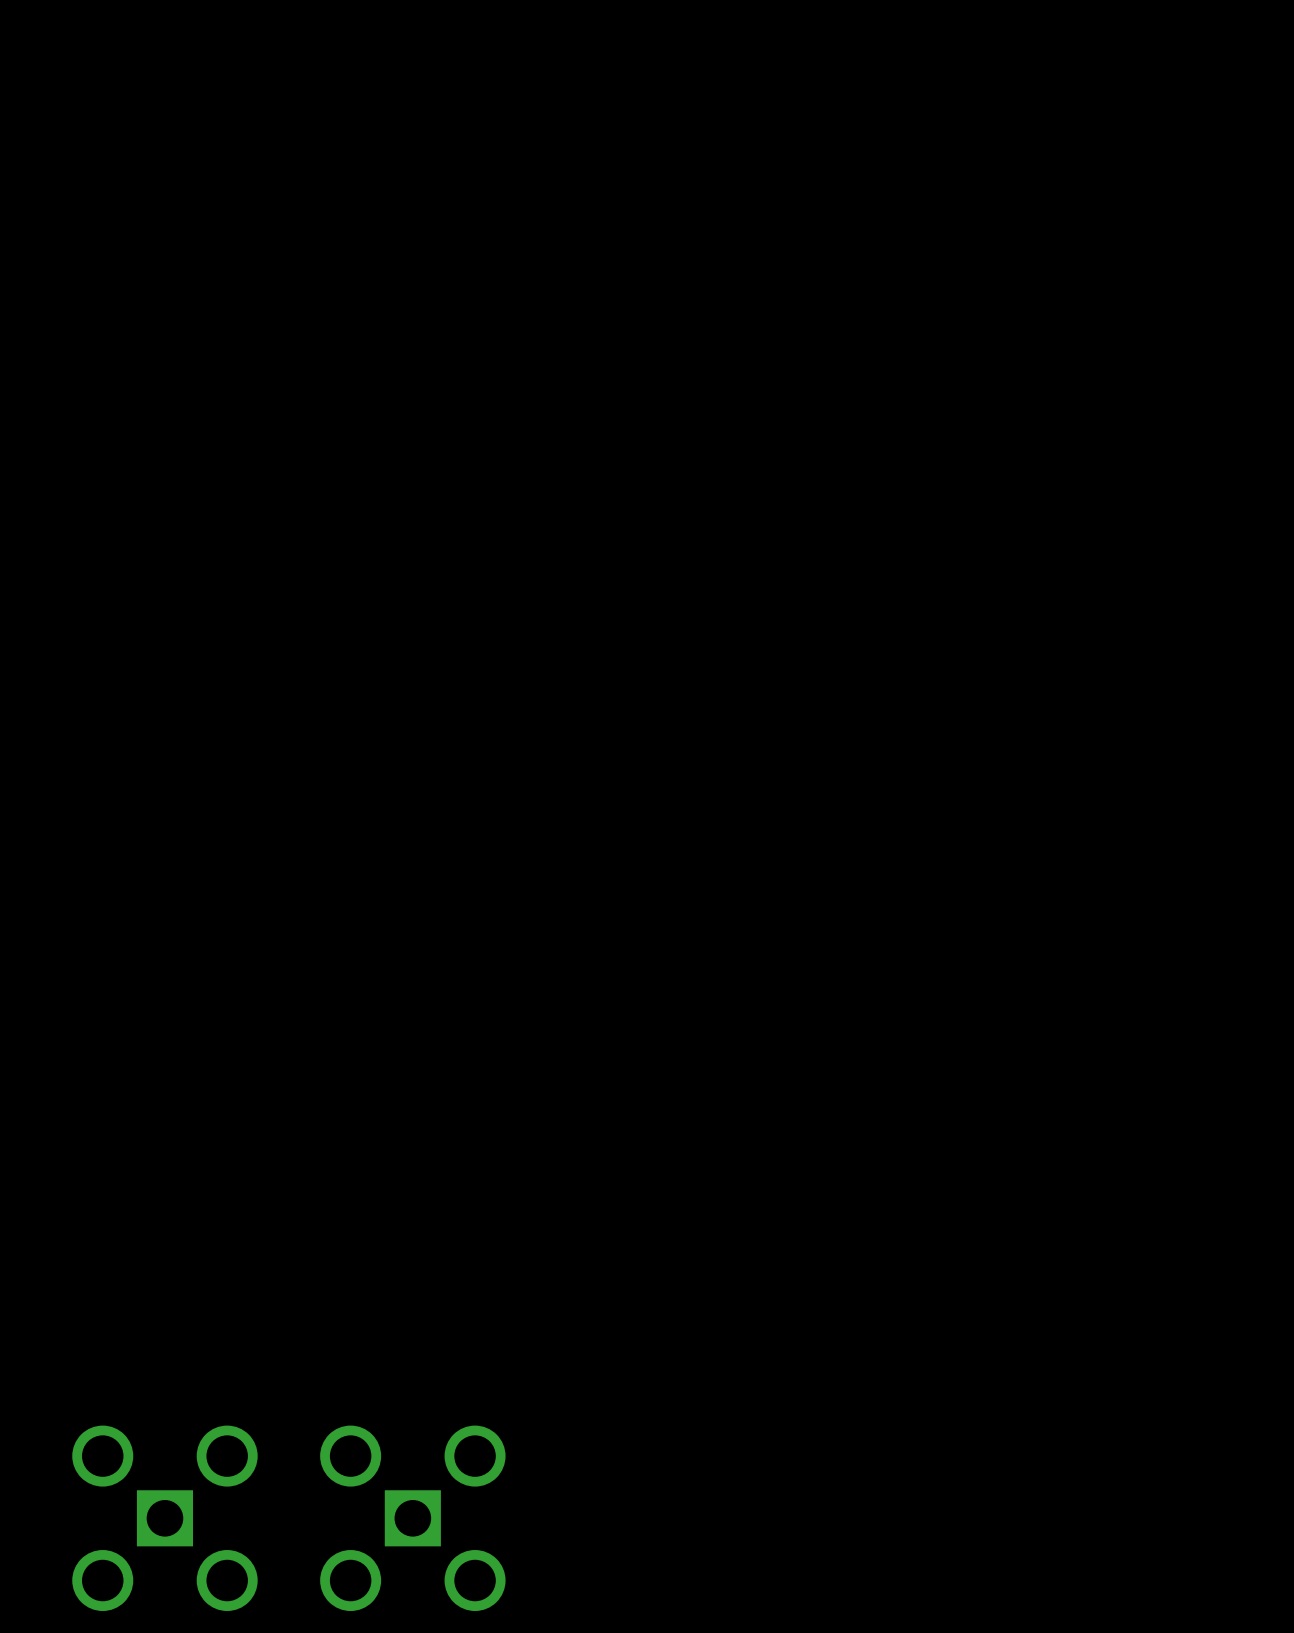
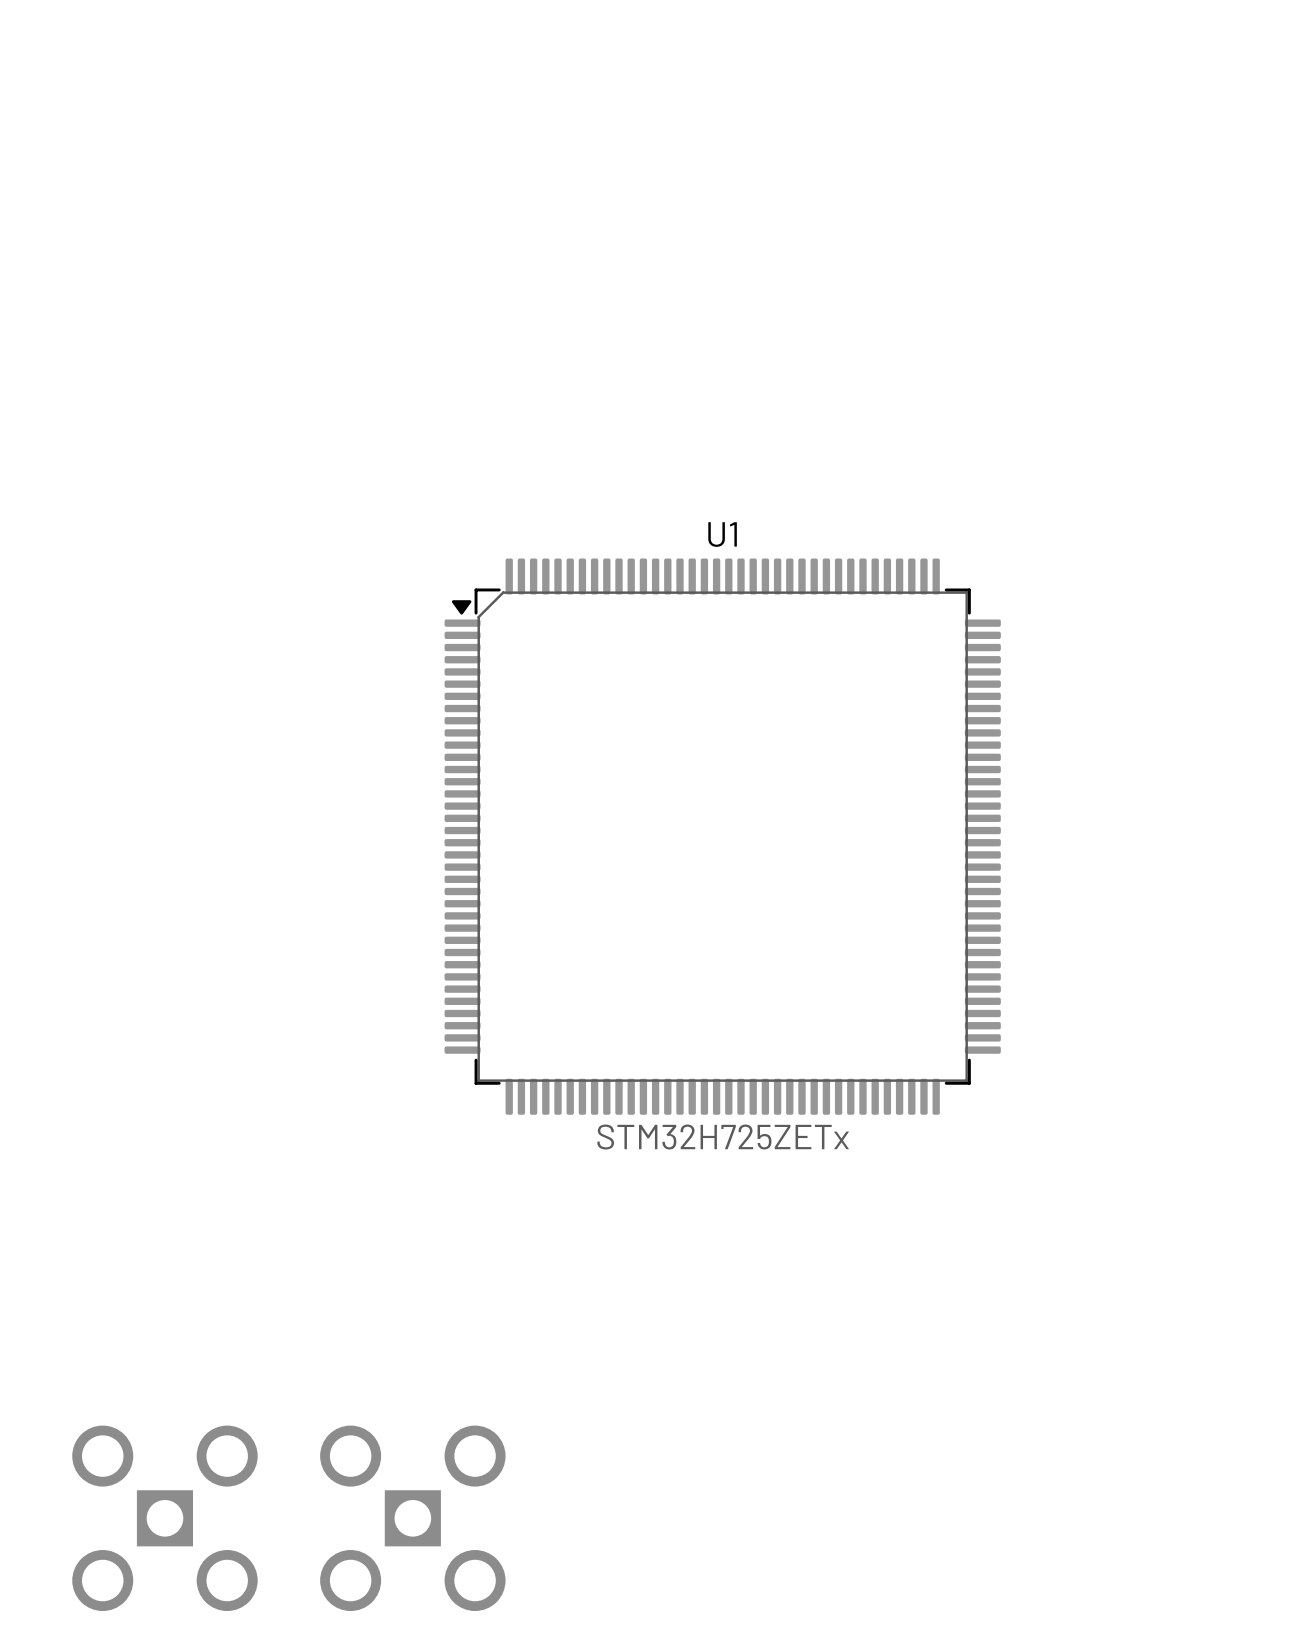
U1: none -> STM32H725ZETx (722, 836)

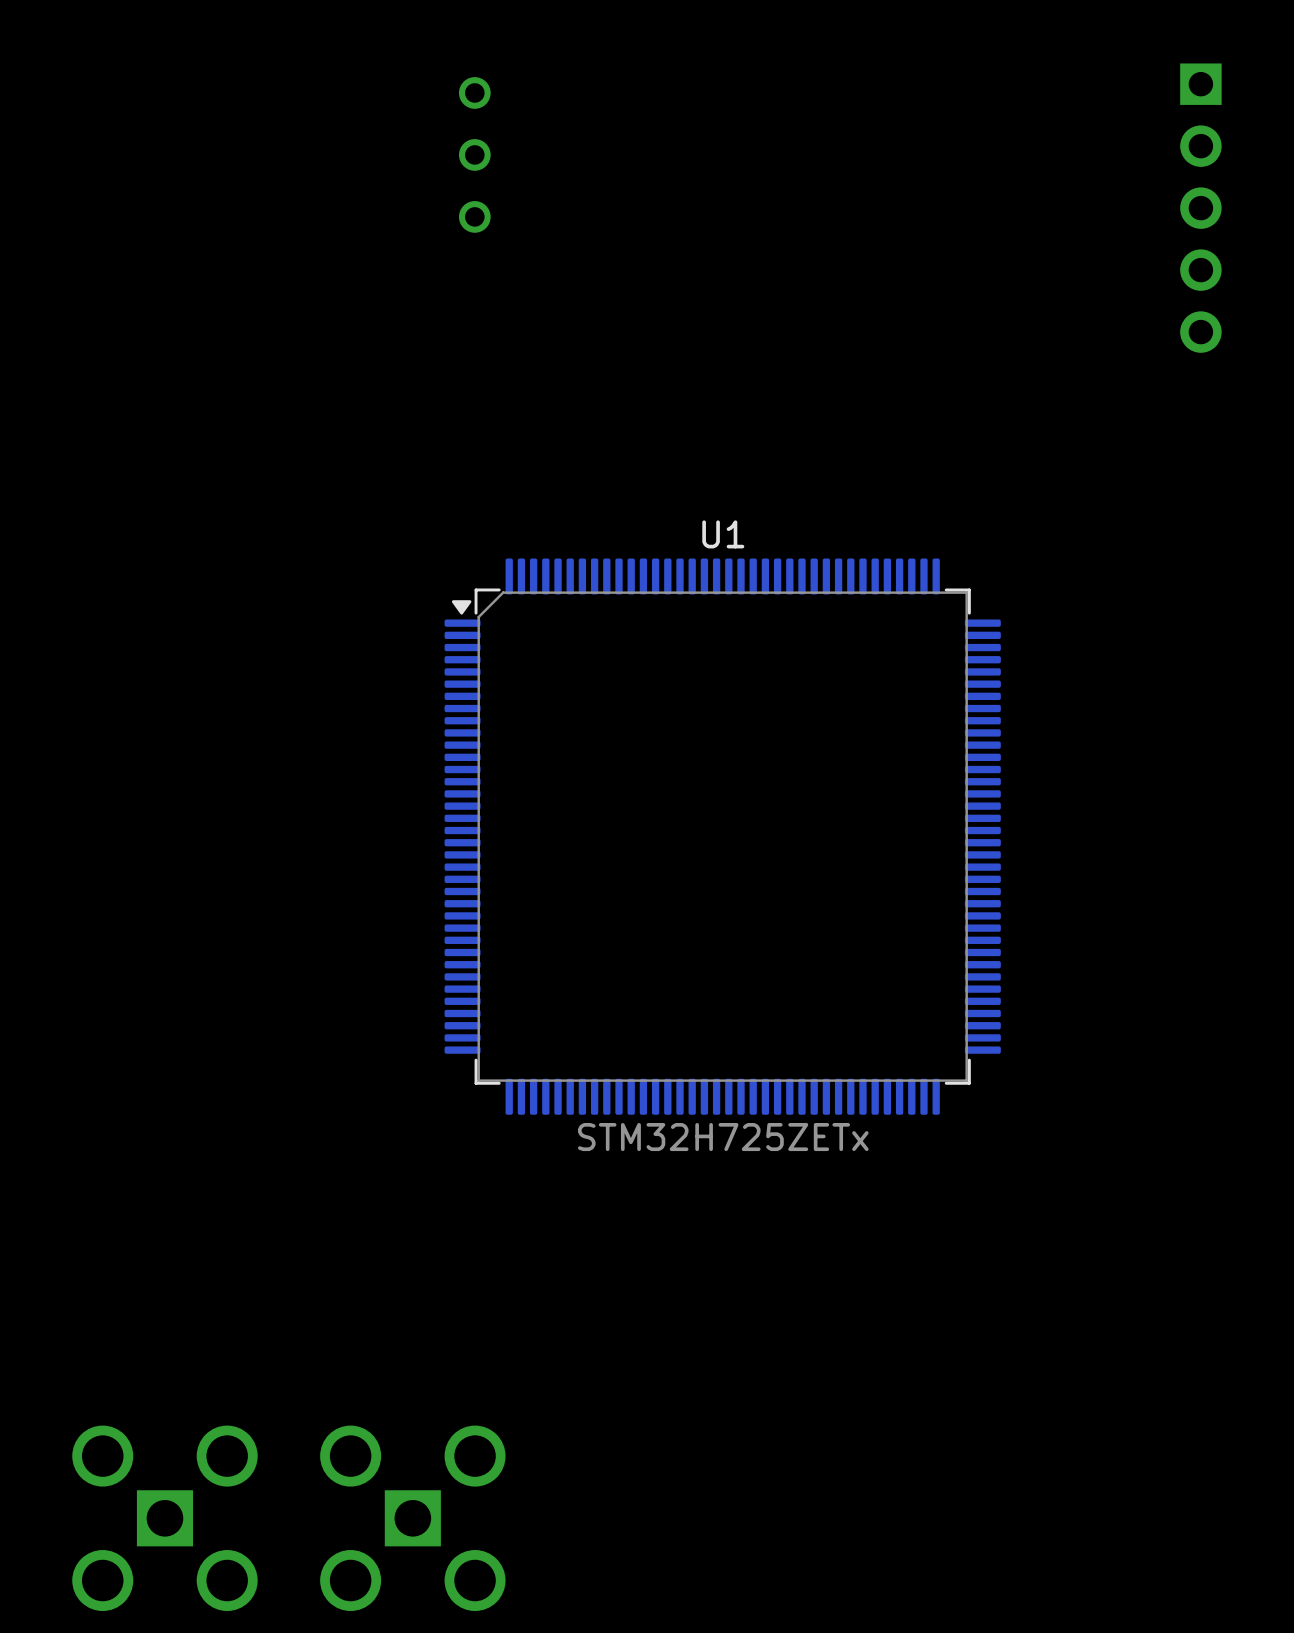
part: none -> (474, 154)
part: none -> (1200, 208)

